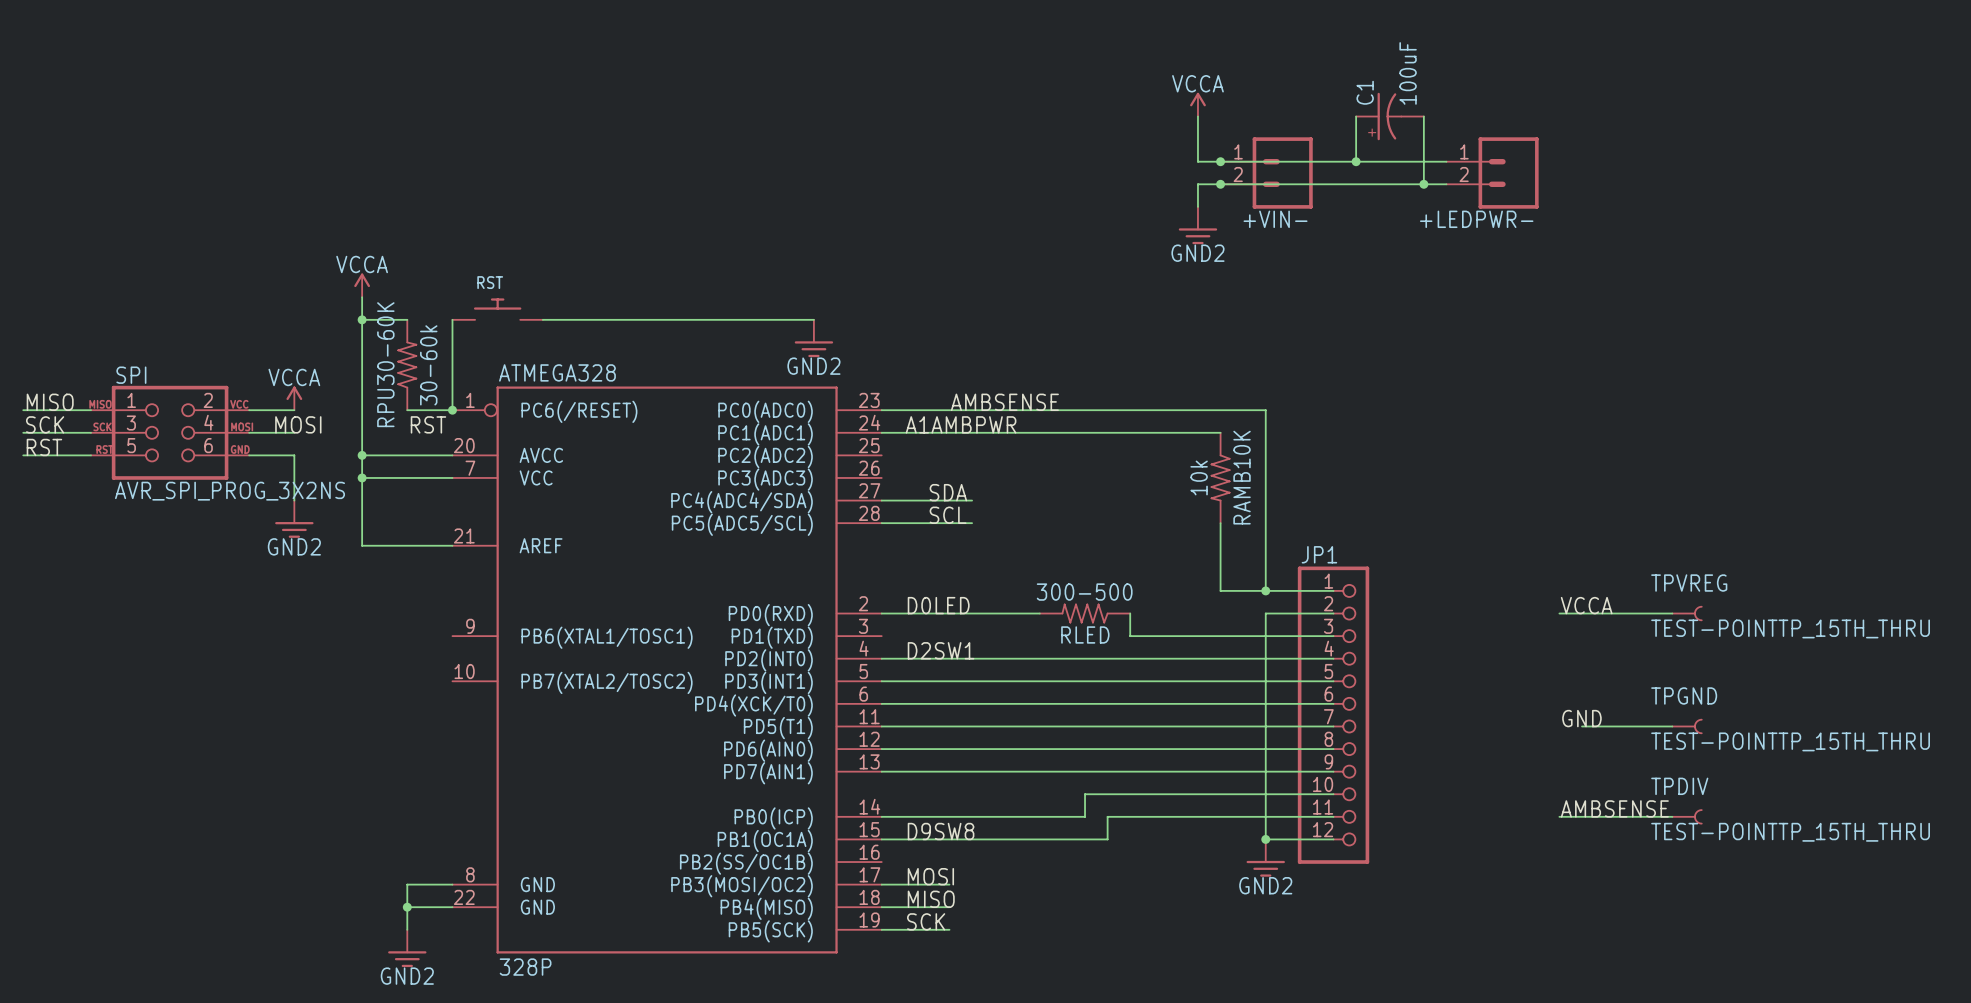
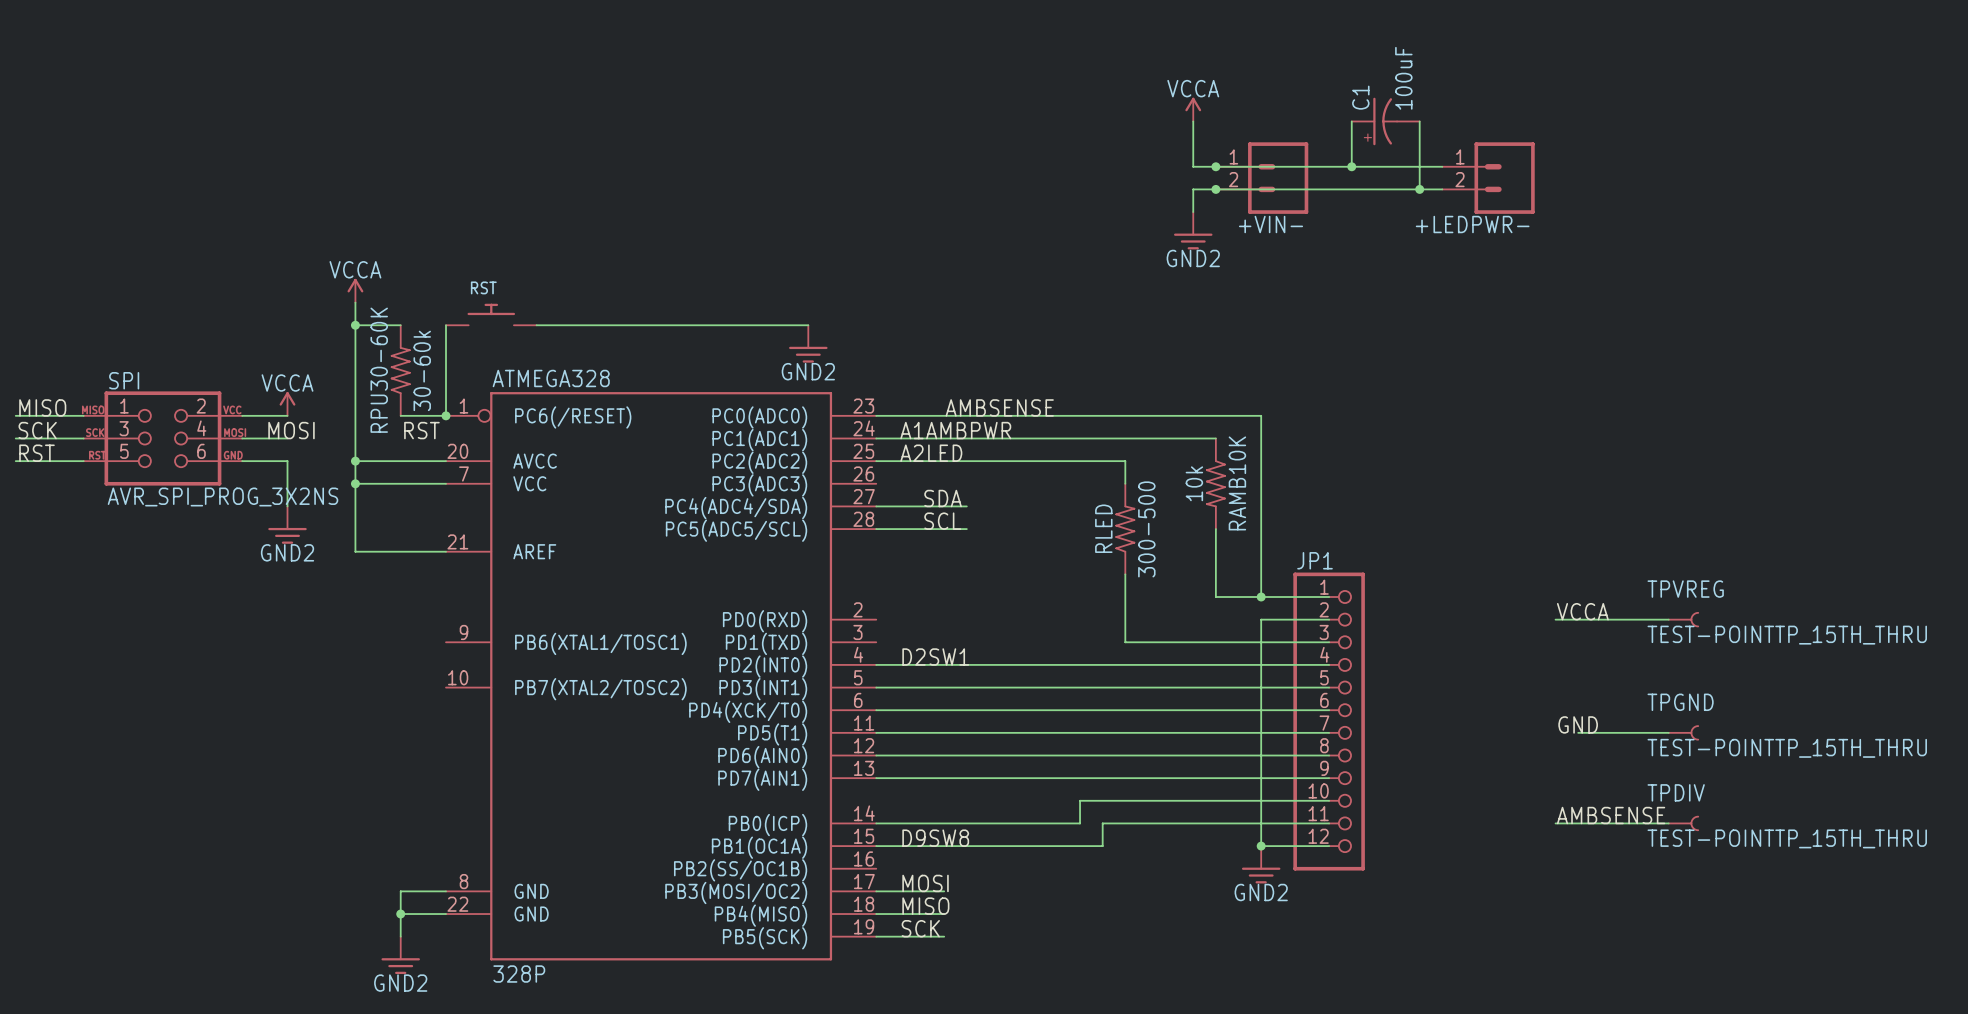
label: none -> A2LED (931, 453)
wire: none -> (876, 461) (1125, 461) (1125, 483)
wire: none -> (1125, 574) (1125, 619)
label: D0LED (938, 605) -> none
wire: (881, 613) (1039, 613) -> none
RLED rotation: 0° (1085, 613) -> 90° clockwise (1125, 529)
RLED position: (1085, 613) -> (1125, 529)

